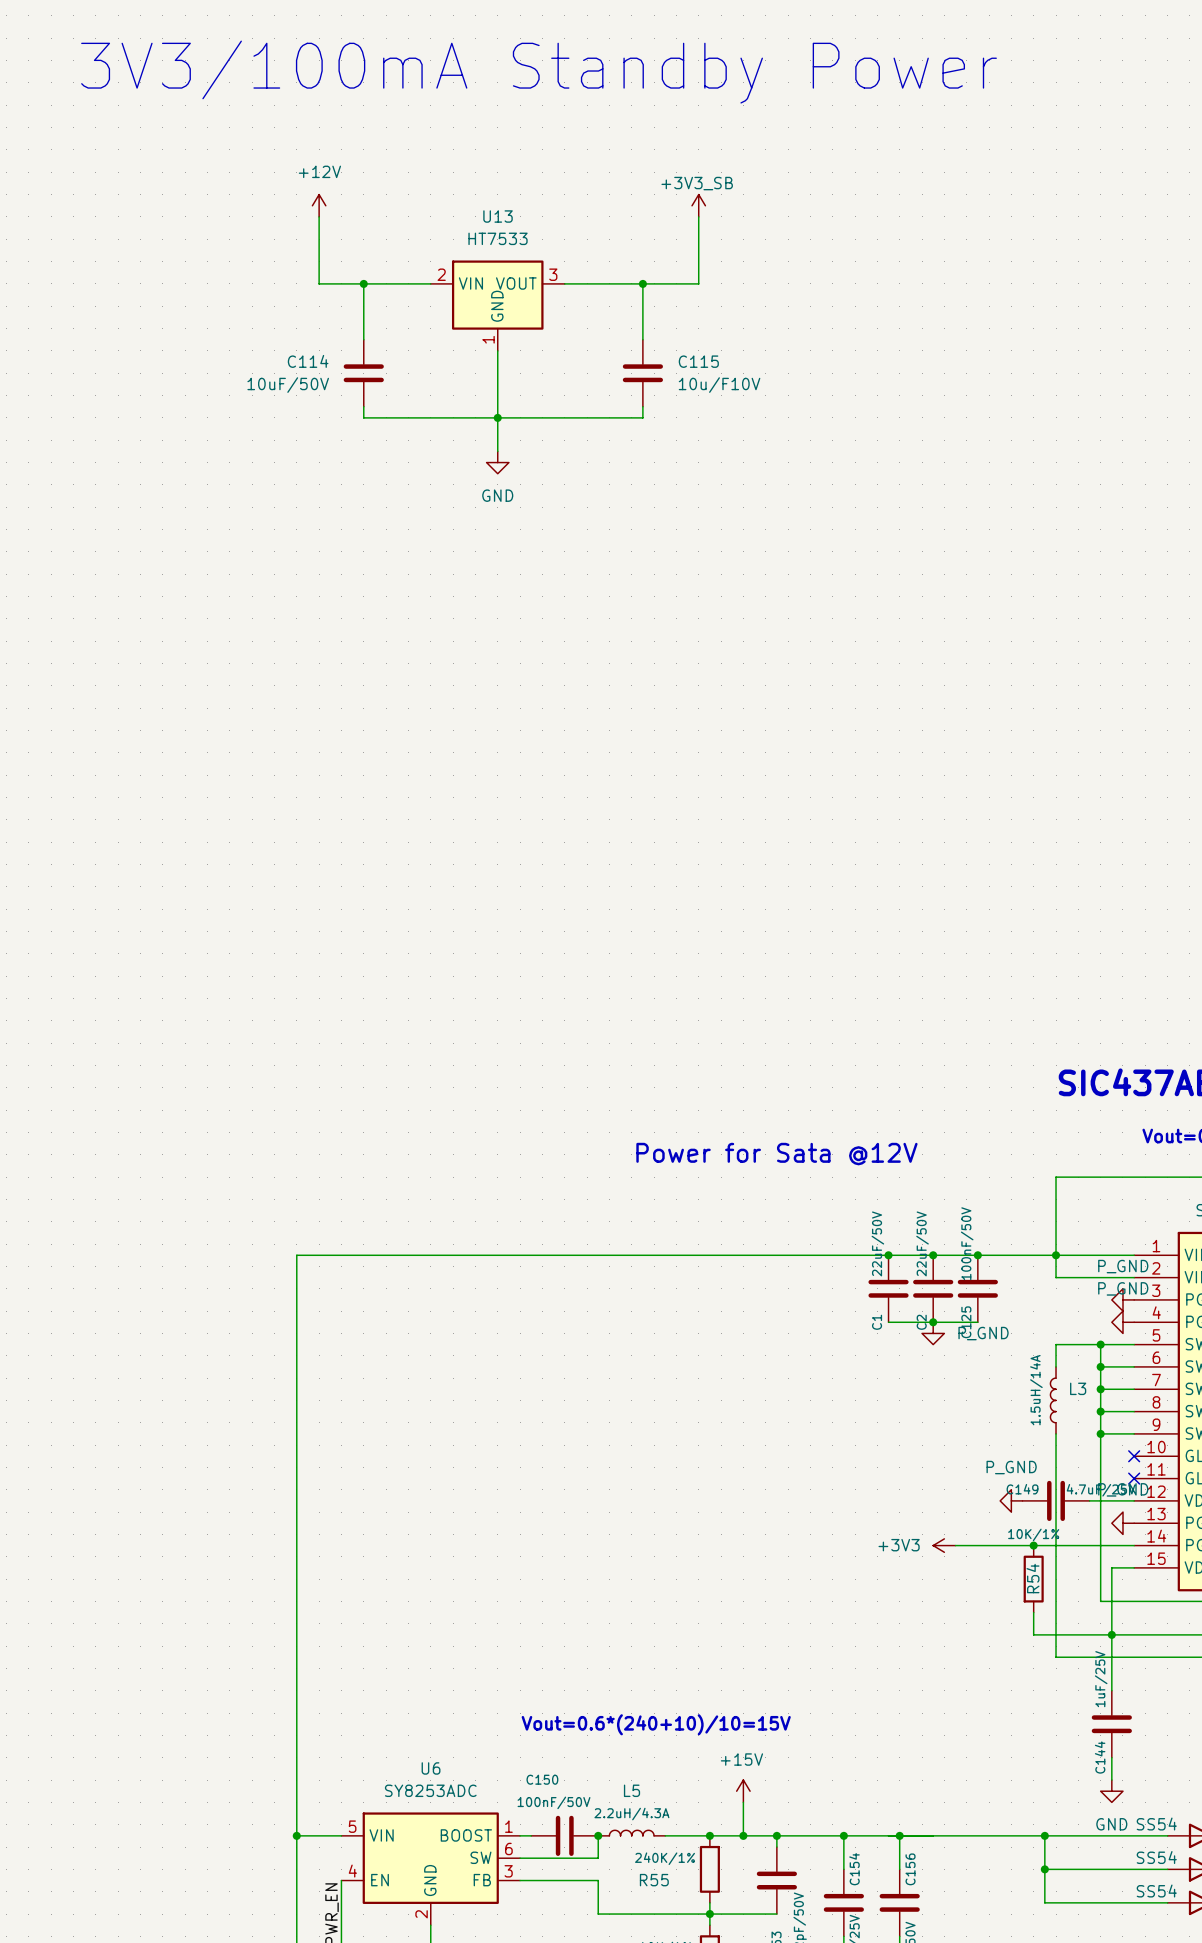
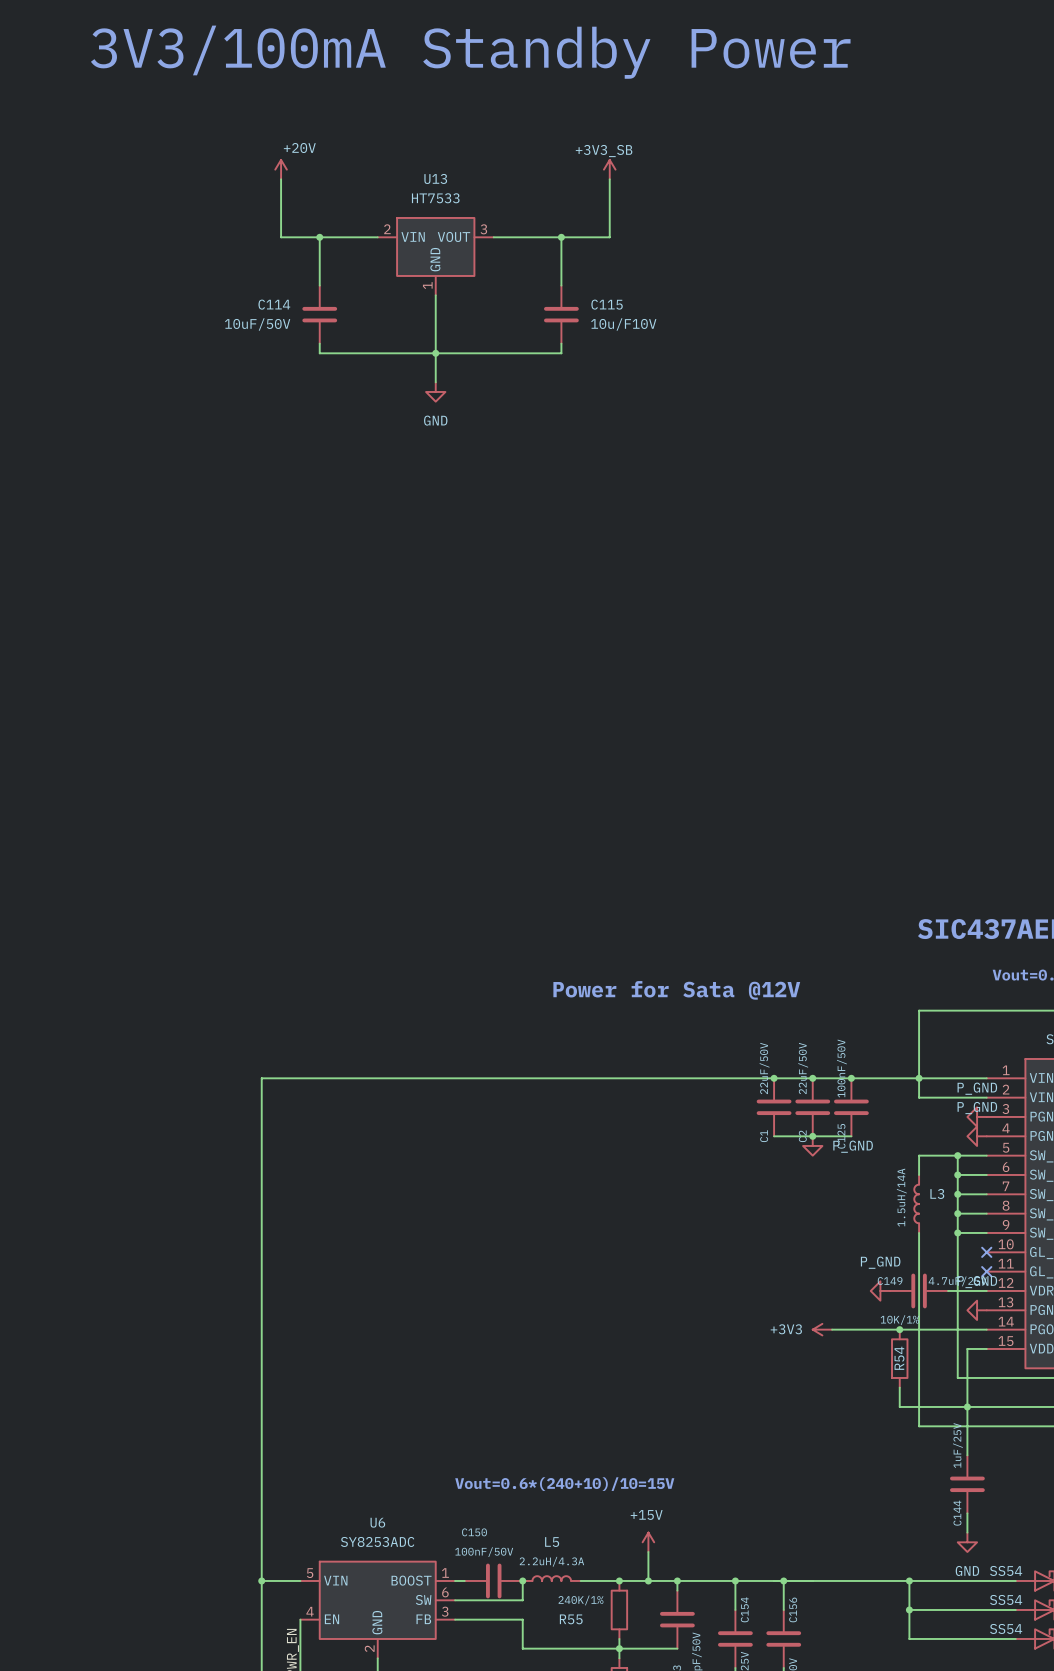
power symbol: +12V (319, 205) -> +20V (281, 169)

